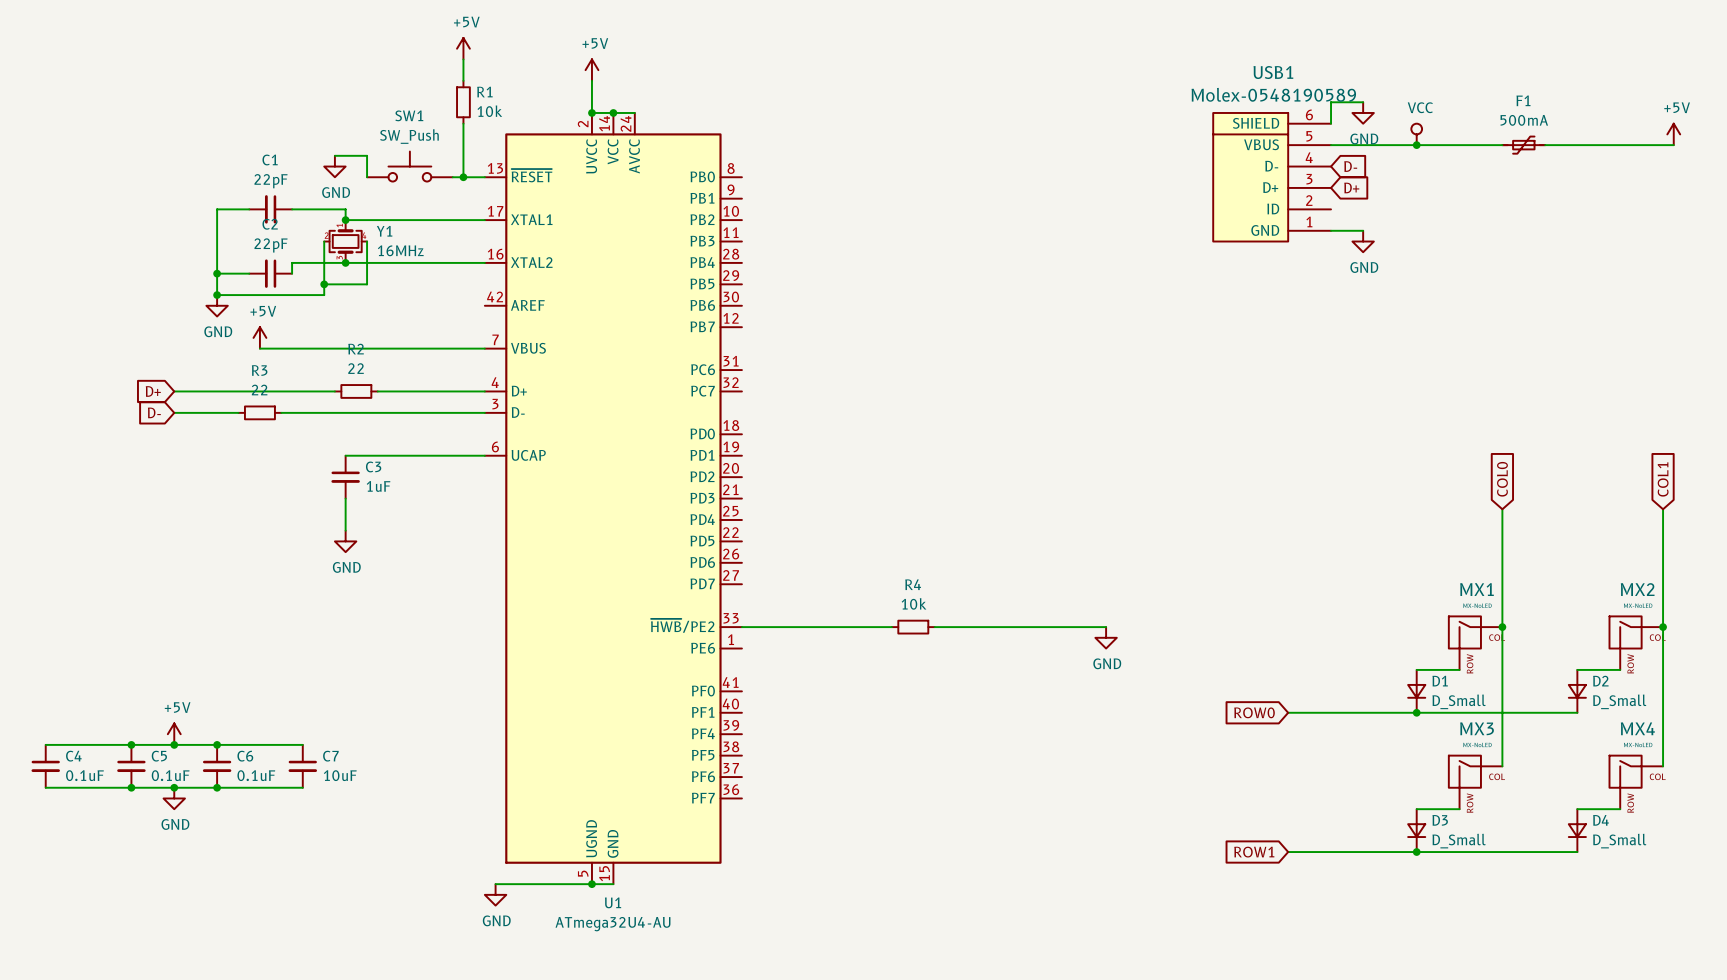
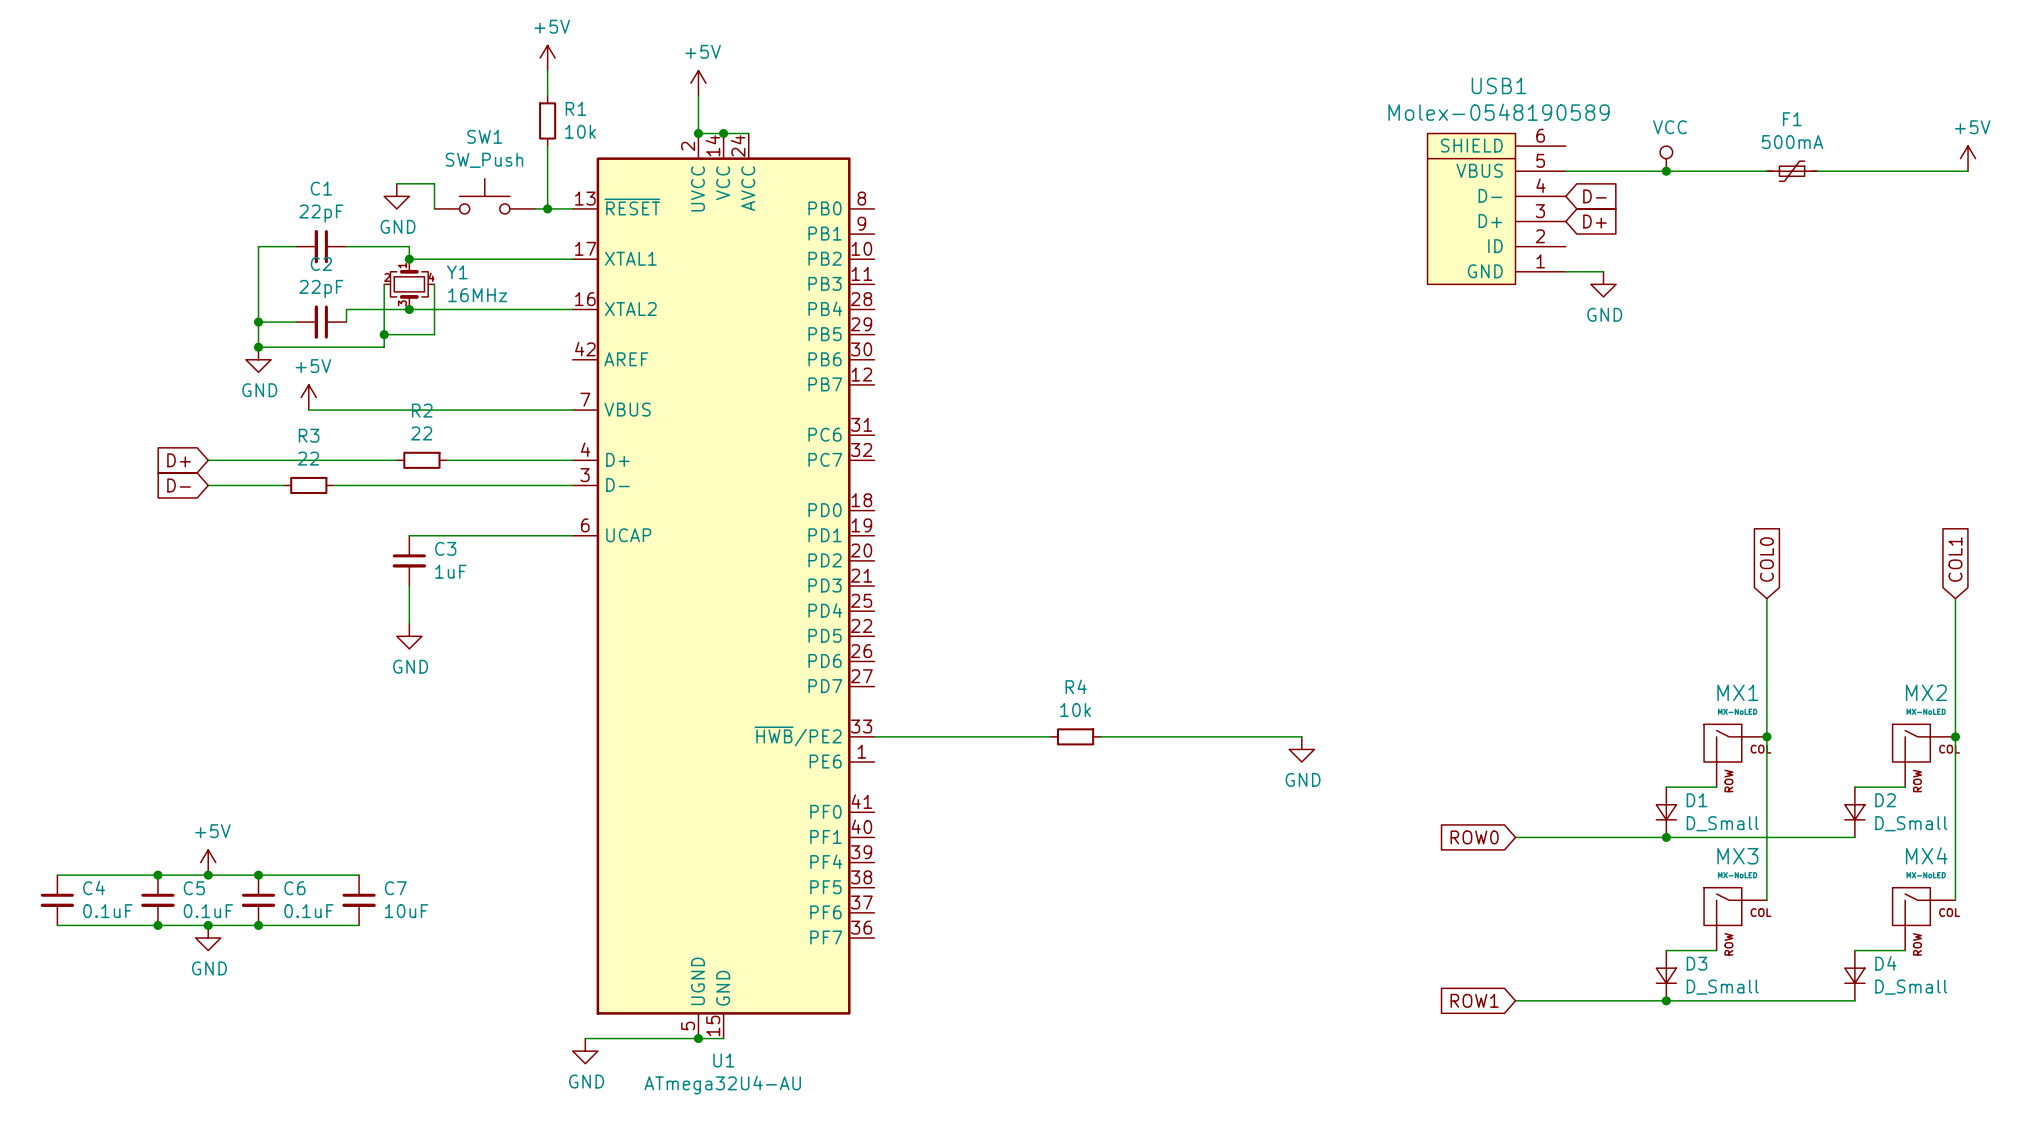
wire: (1363, 102) (1331, 102) (1331, 123) -> none
power symbol: GND (1363, 112) -> none

